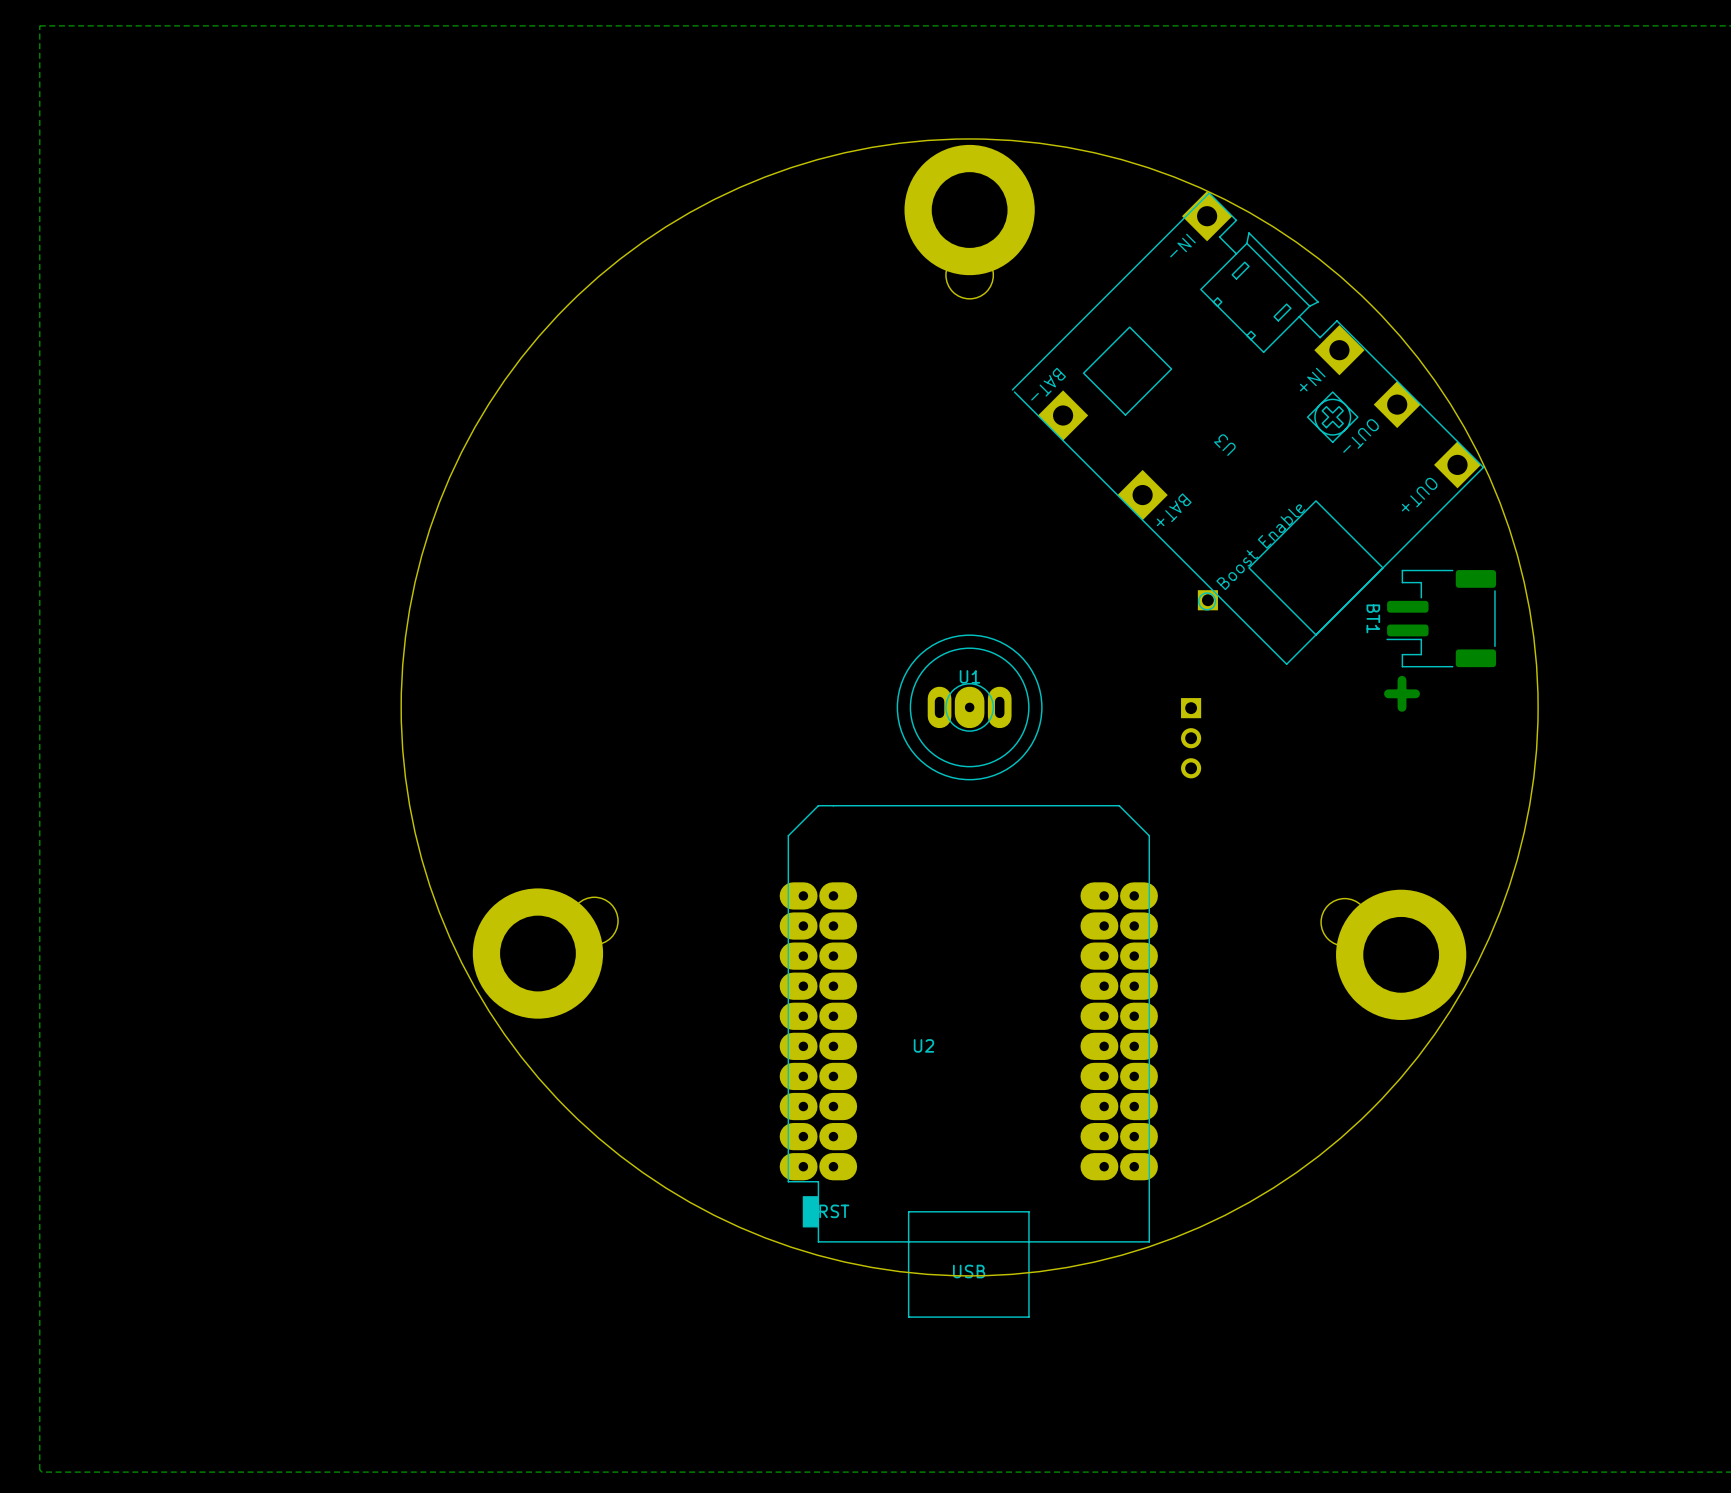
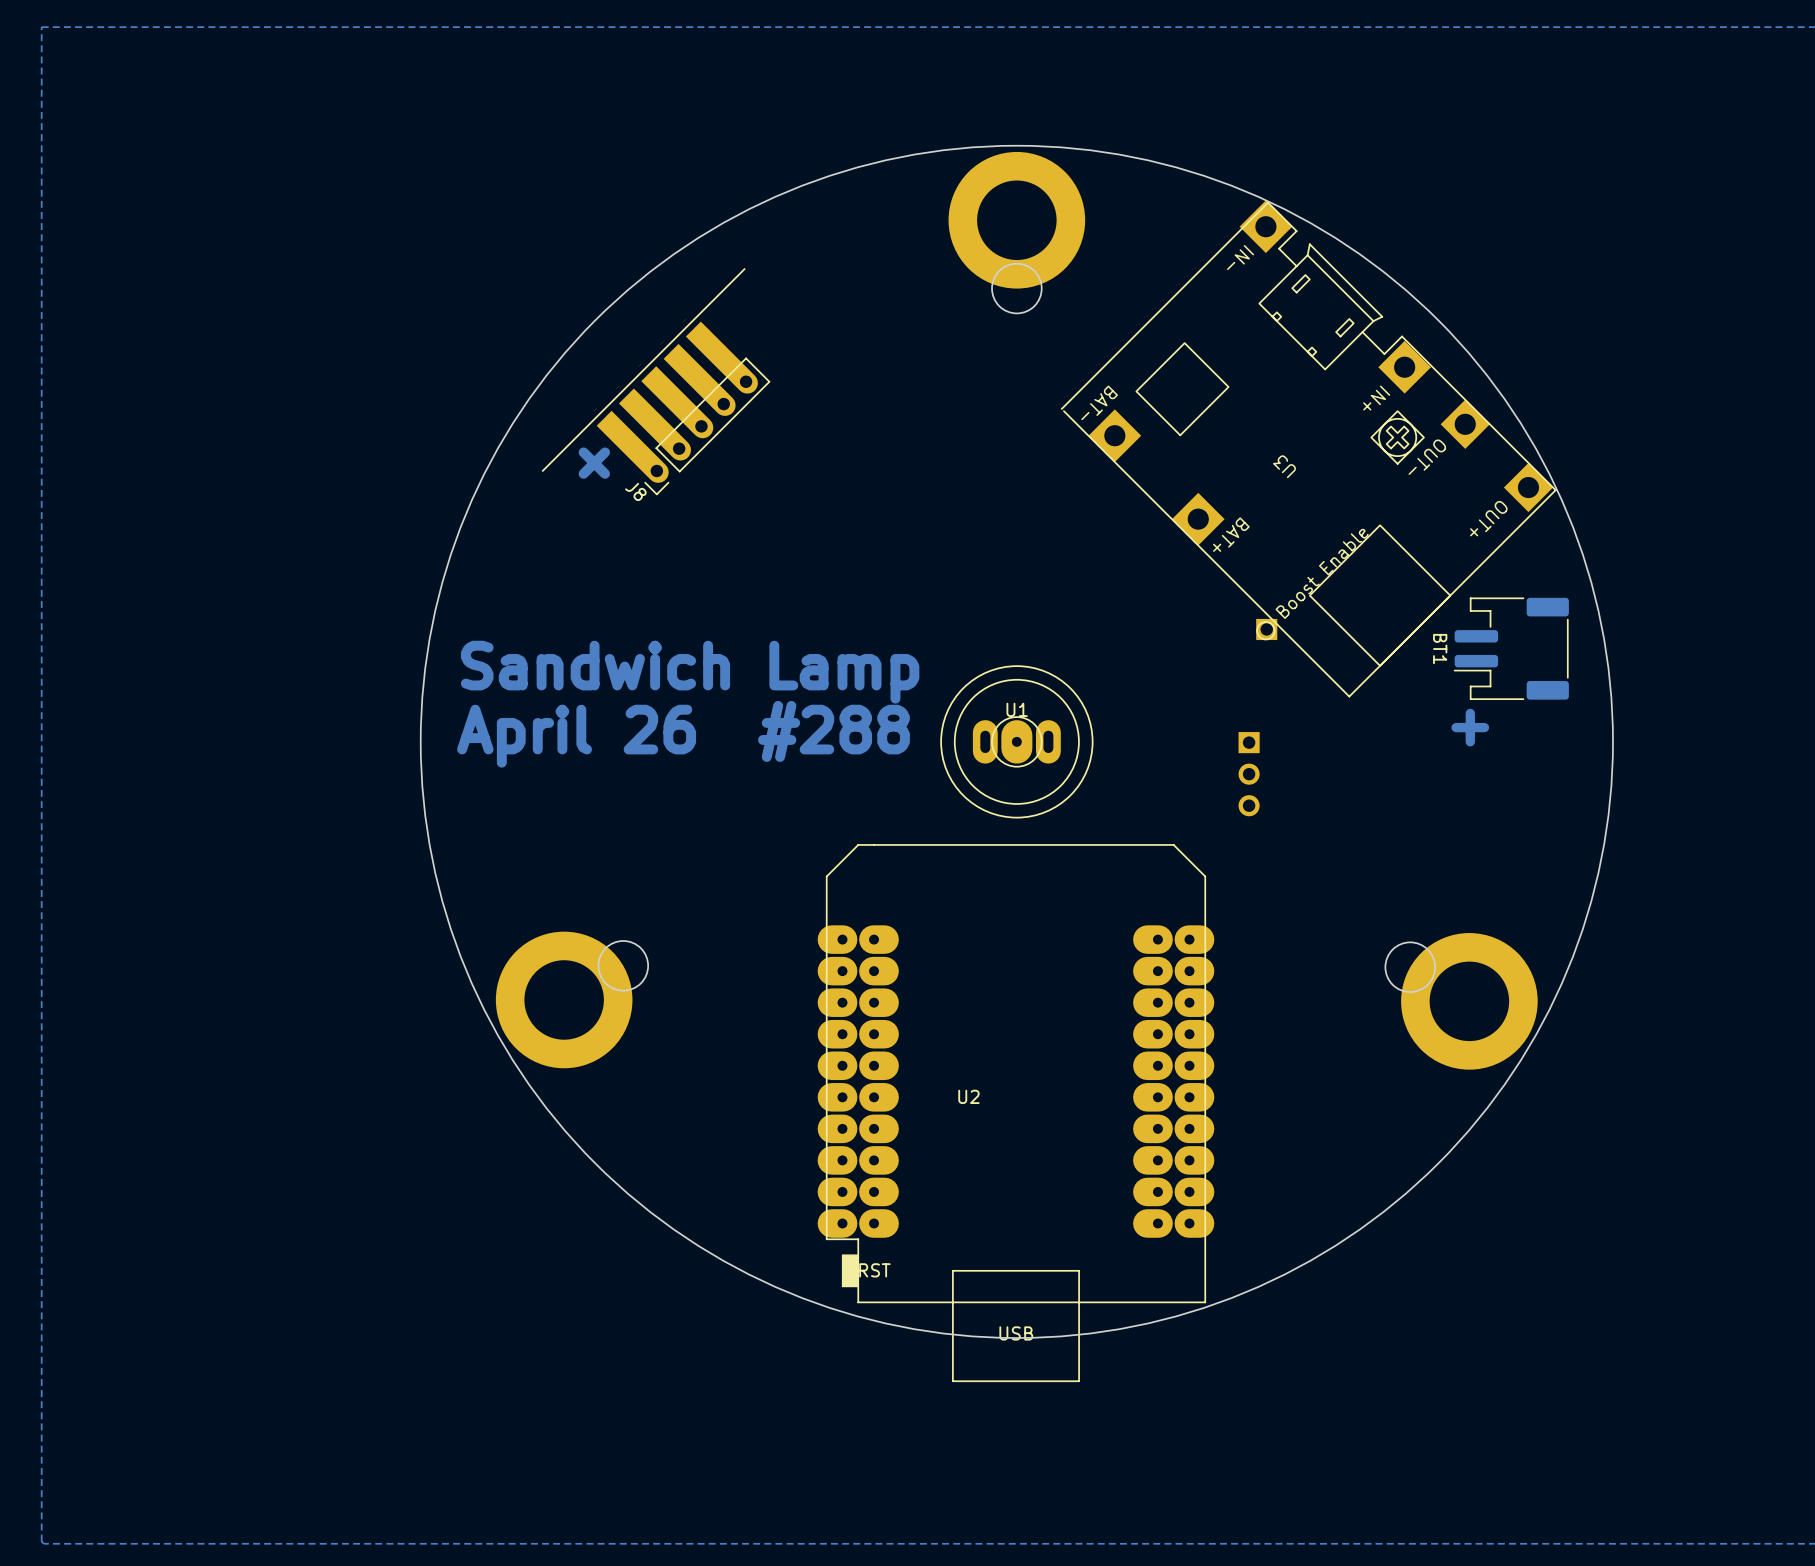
J8: none -> (621, 346)
text: none -> Sandwich Lamp (690, 672)
text: none -> April 26 #288 (683, 734)

